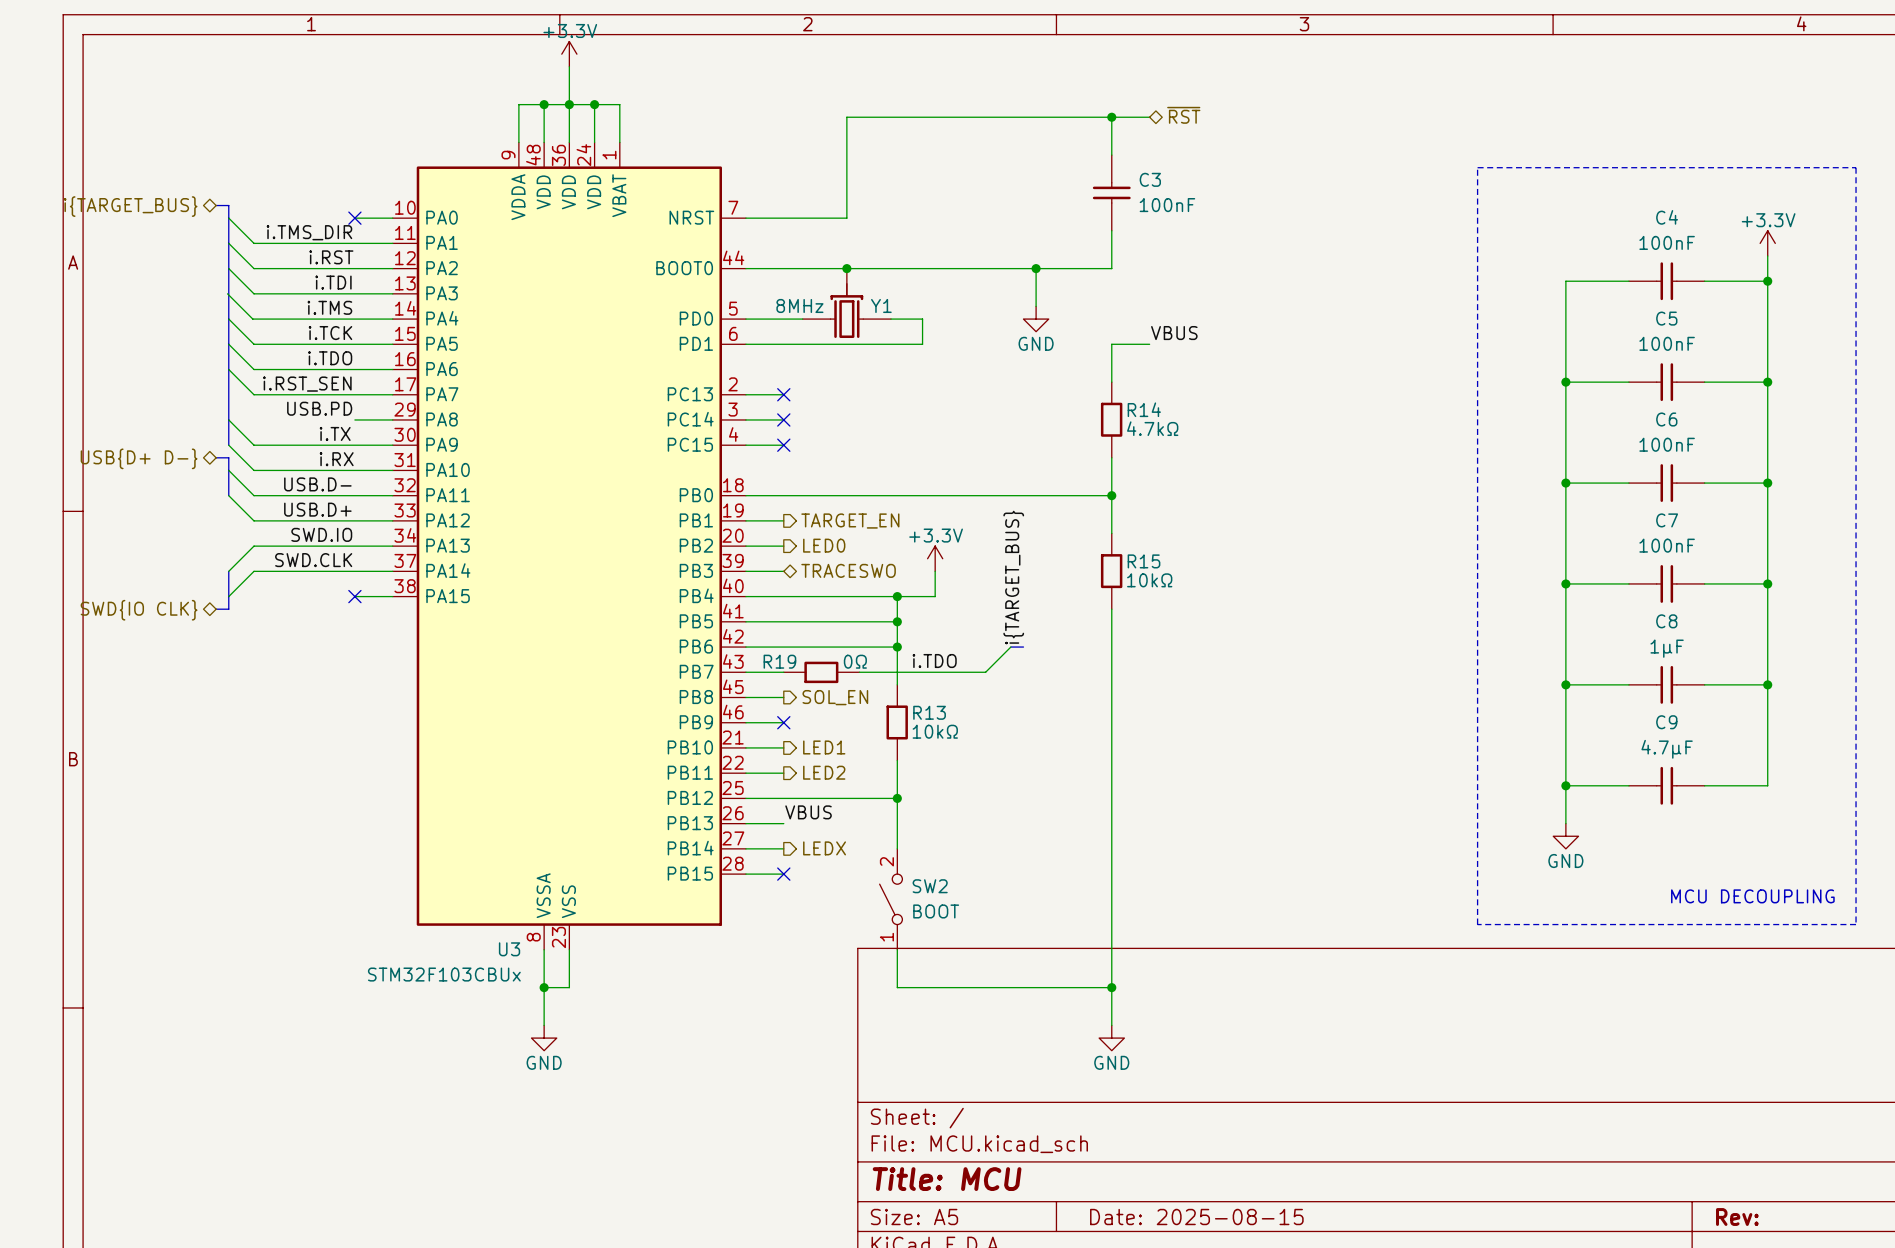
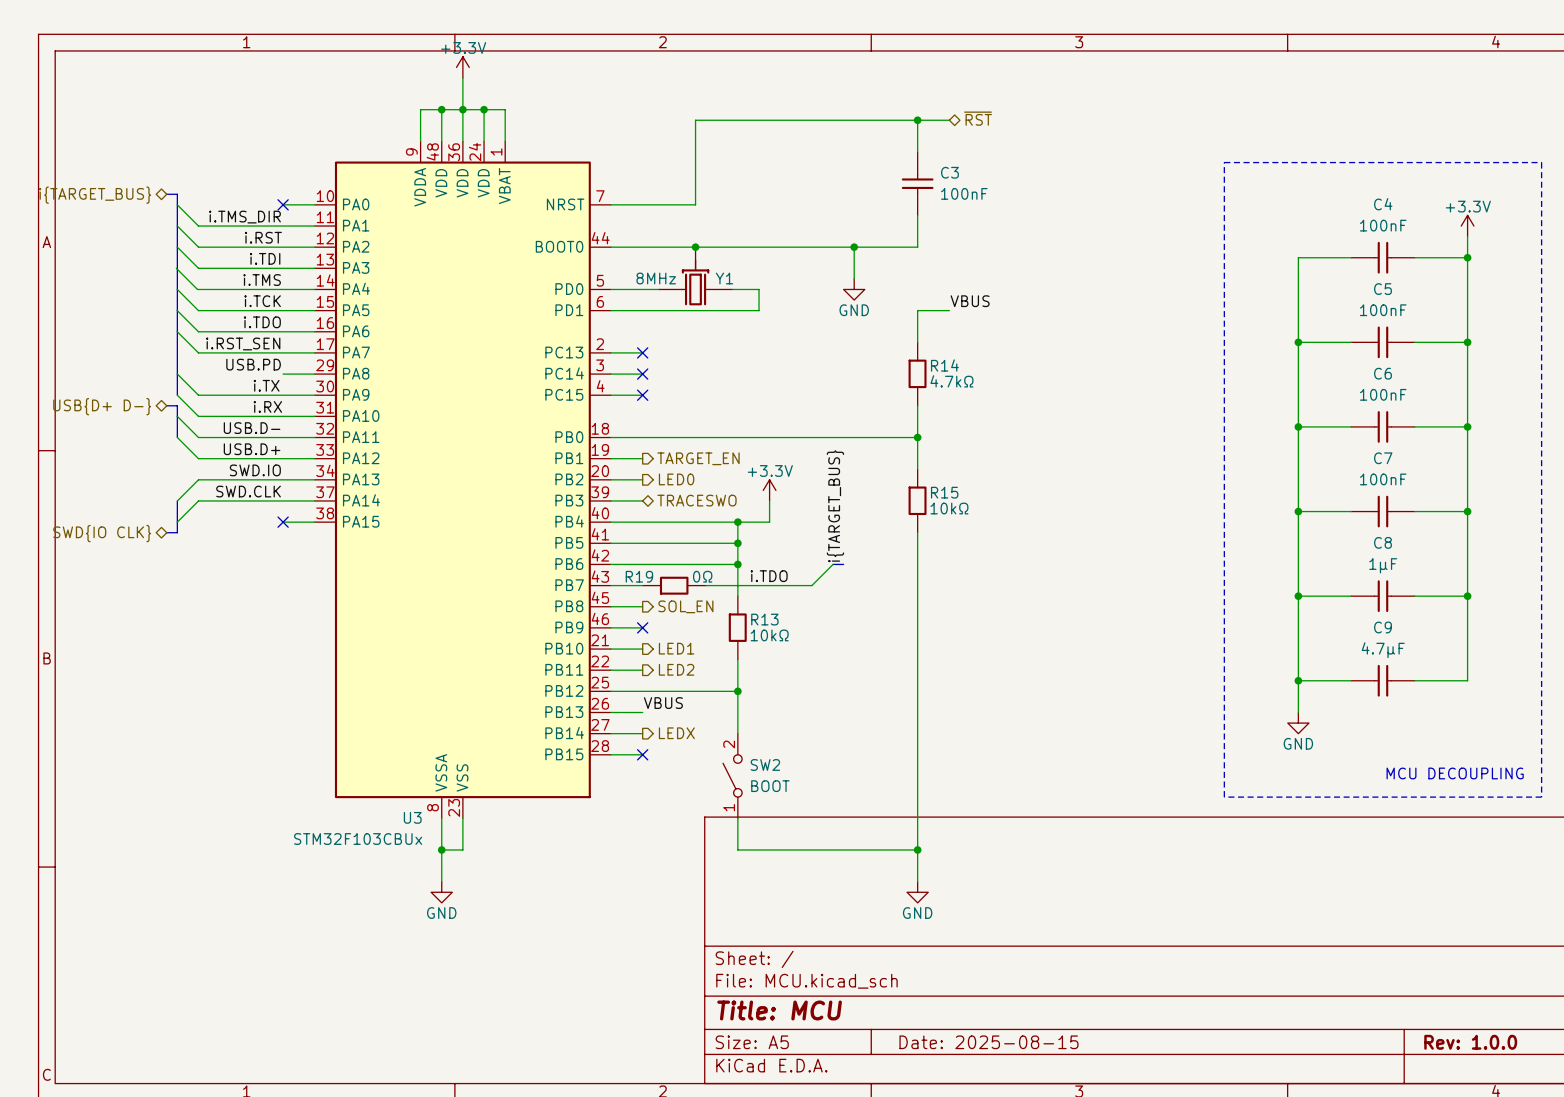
title block: Rev: (1737, 1217) -> Rev: 1.0.0 (1470, 1042)

